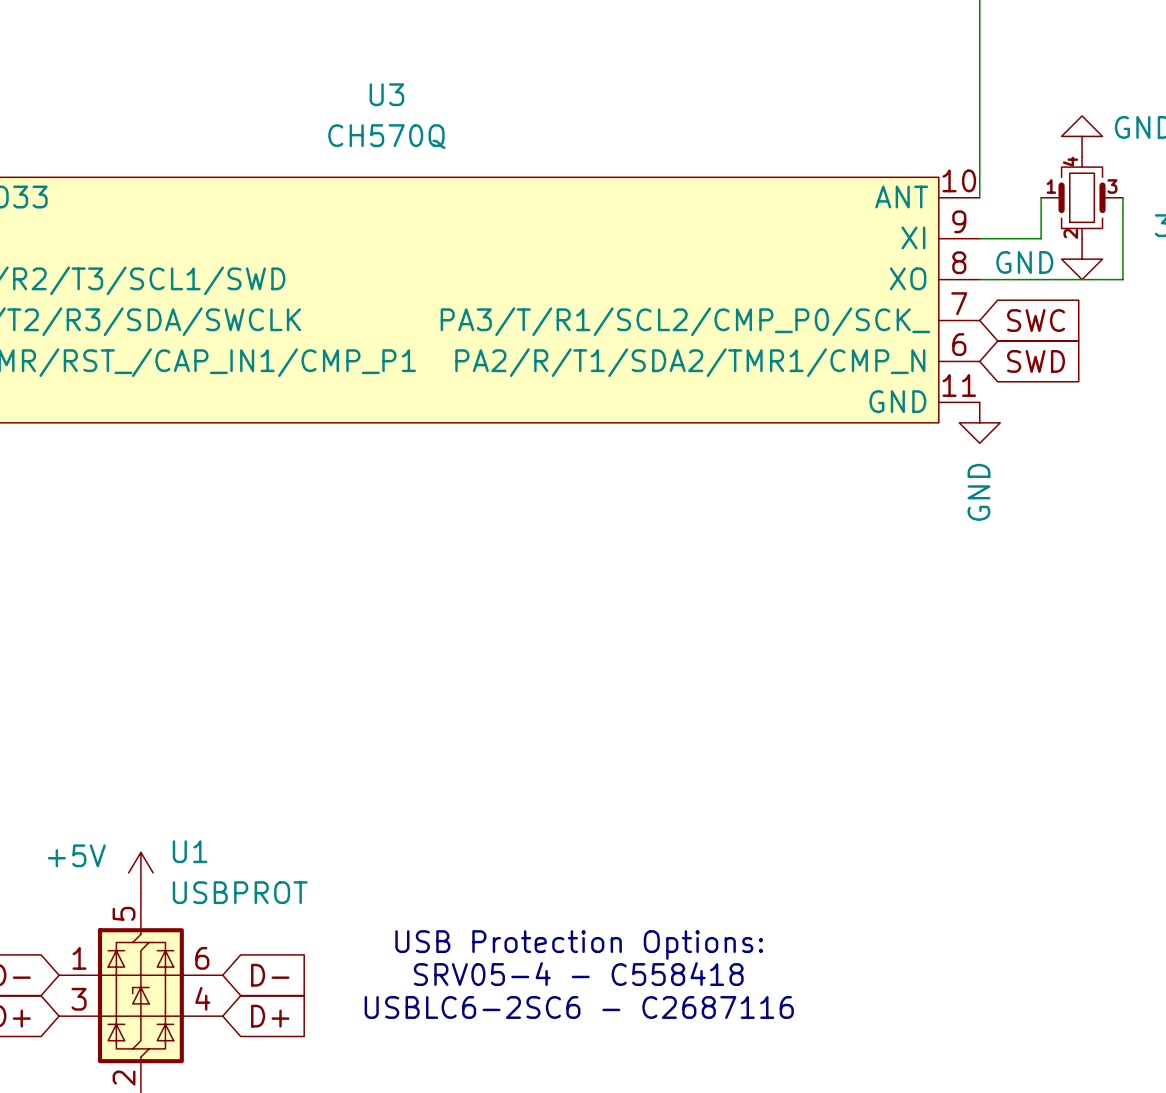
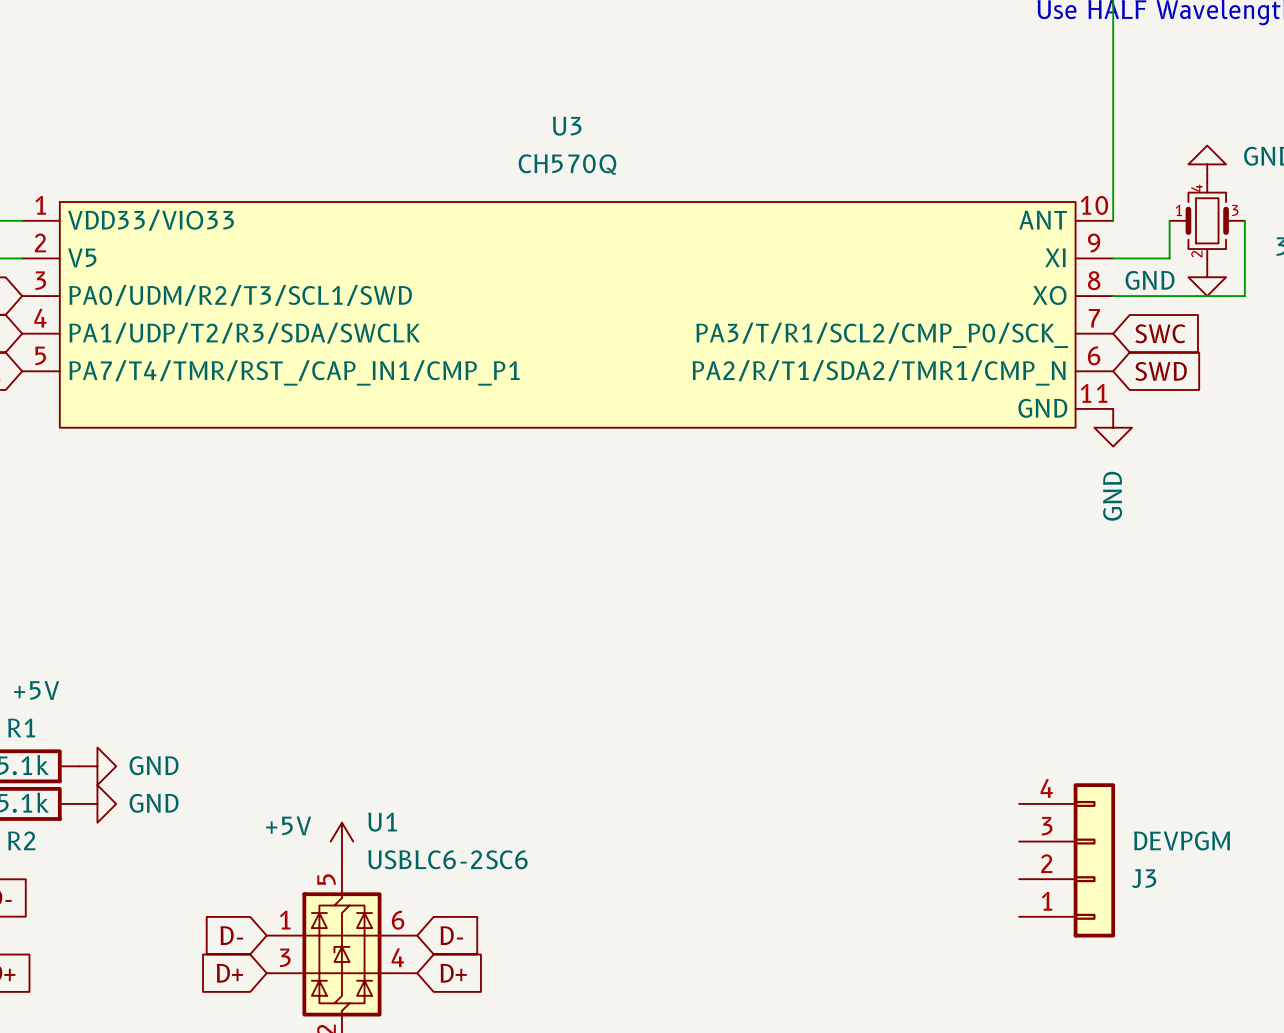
U1 value: USBPROT (240, 892) -> USBLC6-2SC6 (447, 859)
J3: none -> DEVPGM (1067, 860)
text: USB Protection Options: (579, 945) -> none
text: SRV05-4 - C558418 (578, 974) -> none
text: USBLC6-2SC6 - C2687116 (579, 1007) -> none

